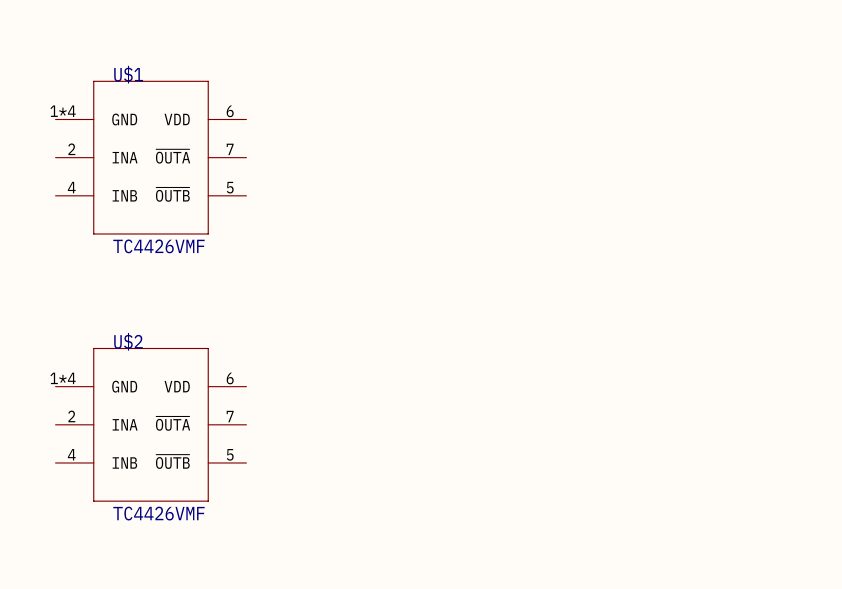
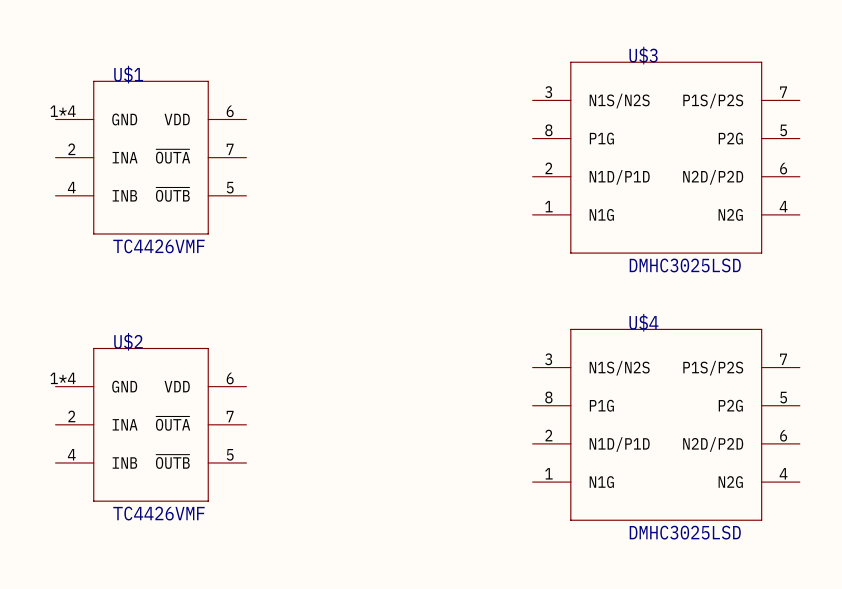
U$3: none -> DMHC3025LSD (666, 157)
U$4: none -> DMHC3025LSD (666, 424)

